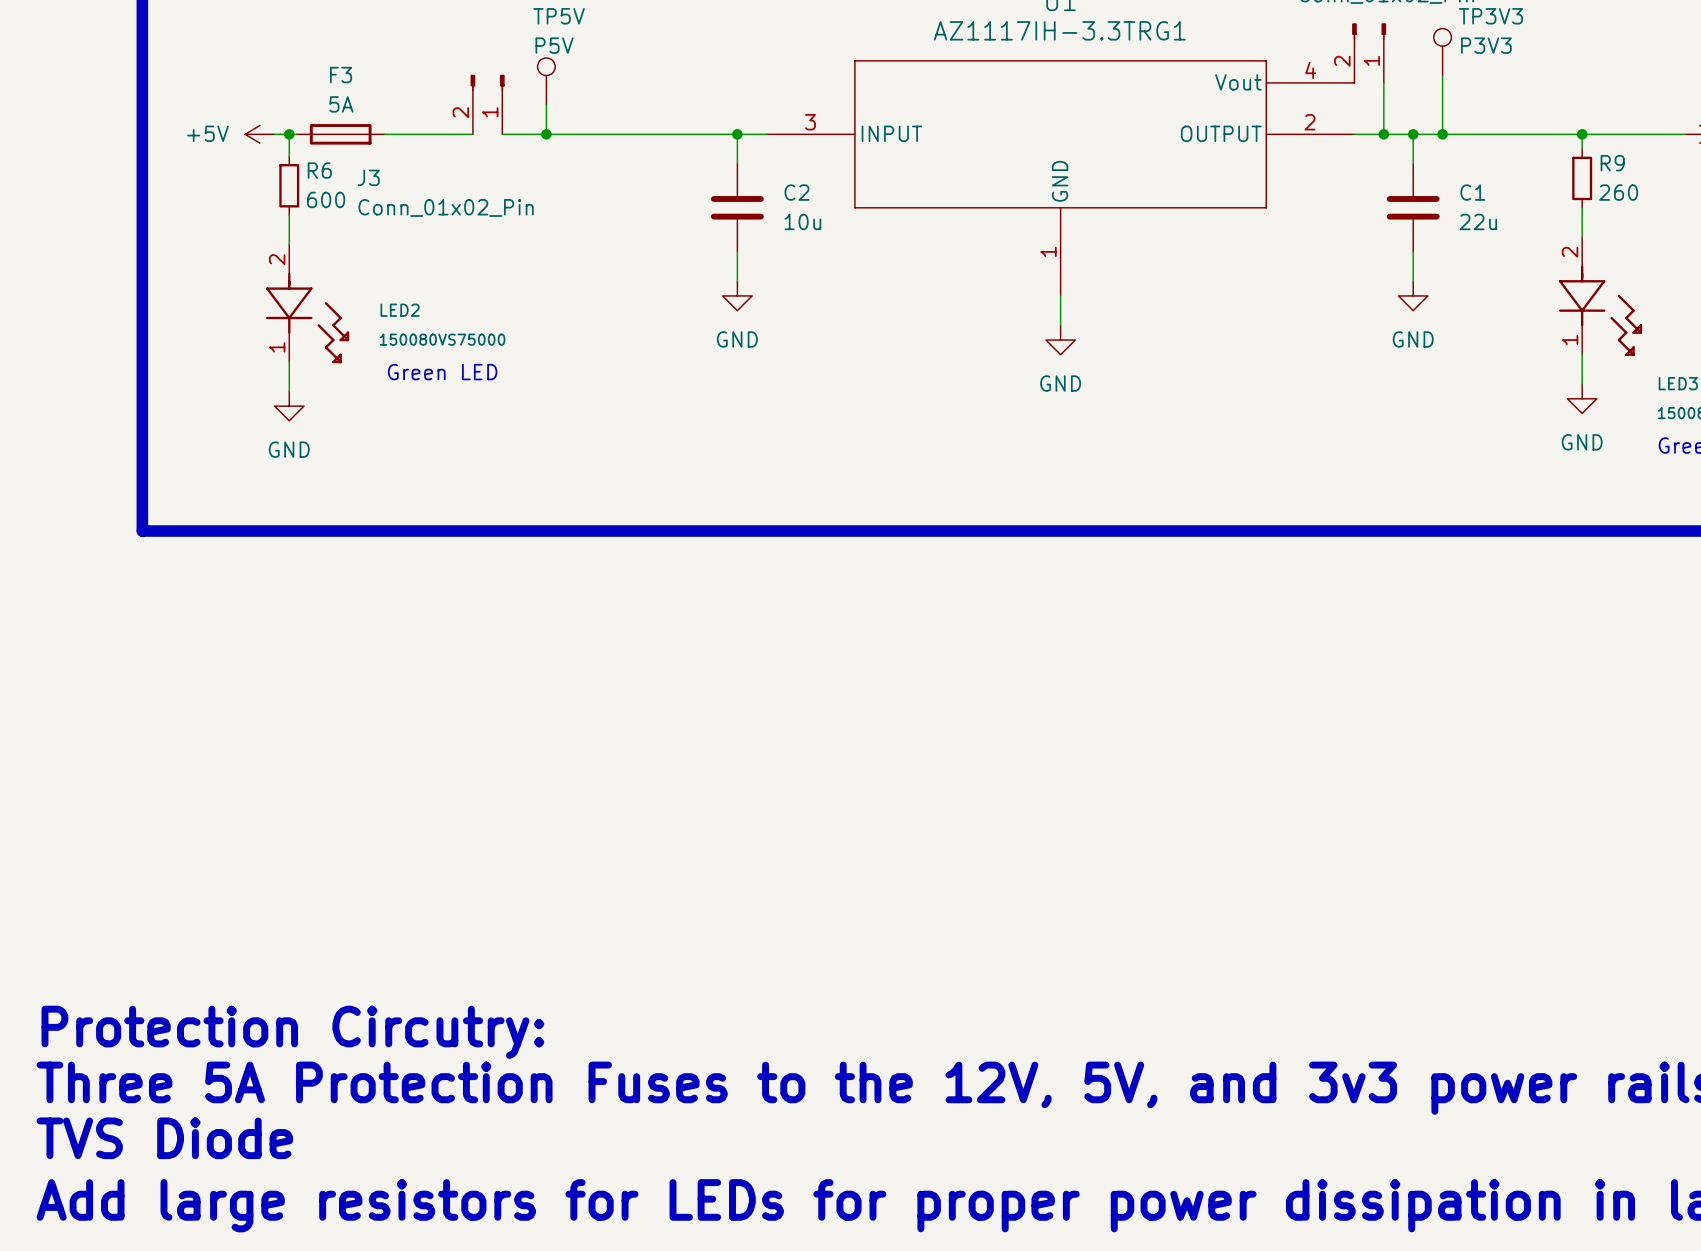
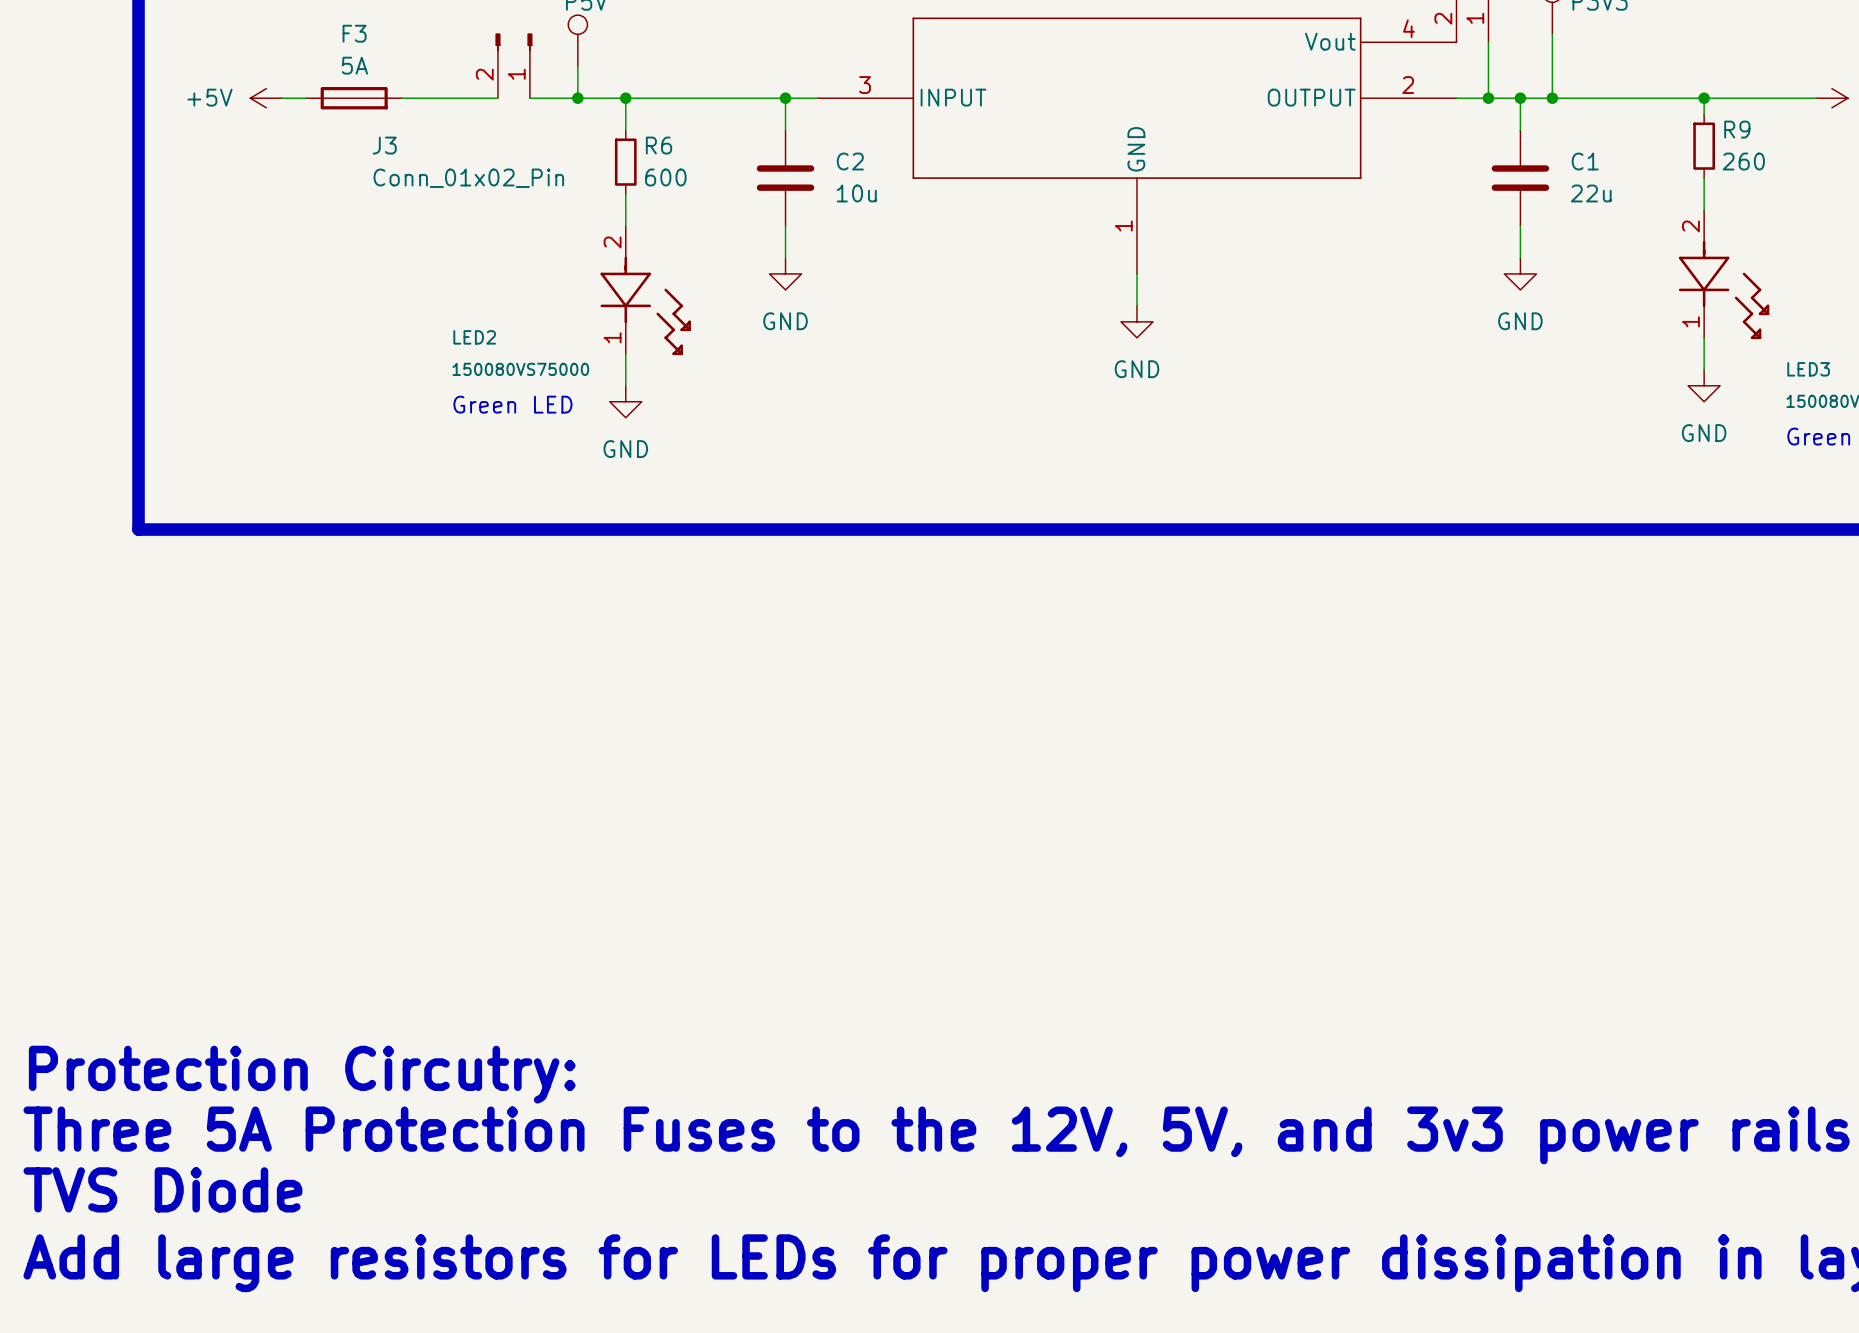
wire: (289, 134) (289, 156) -> none
junction: (289, 134) -> none
wire: none -> (625, 98) (625, 130)
junction: none -> (625, 98)
R6 position: (289, 185) -> (625, 162)
wire: (289, 215) (289, 244) -> none
wire: none -> (625, 194) (625, 226)
LED2 position: (307, 303) -> (645, 290)
LED2 name position: LED2 (400, 310) -> LED2 (474, 337)
LED2 value position: 150080VS75000 (442, 339) -> 150080VS75000 (520, 369)
wire: (289, 362) (289, 391) -> none
wire: none -> (625, 353) (625, 385)
text position: Green LED (442, 372) -> Green LED (512, 404)
power symbol: GND (289, 406) -> none
power symbol: none -> GND (625, 401)

